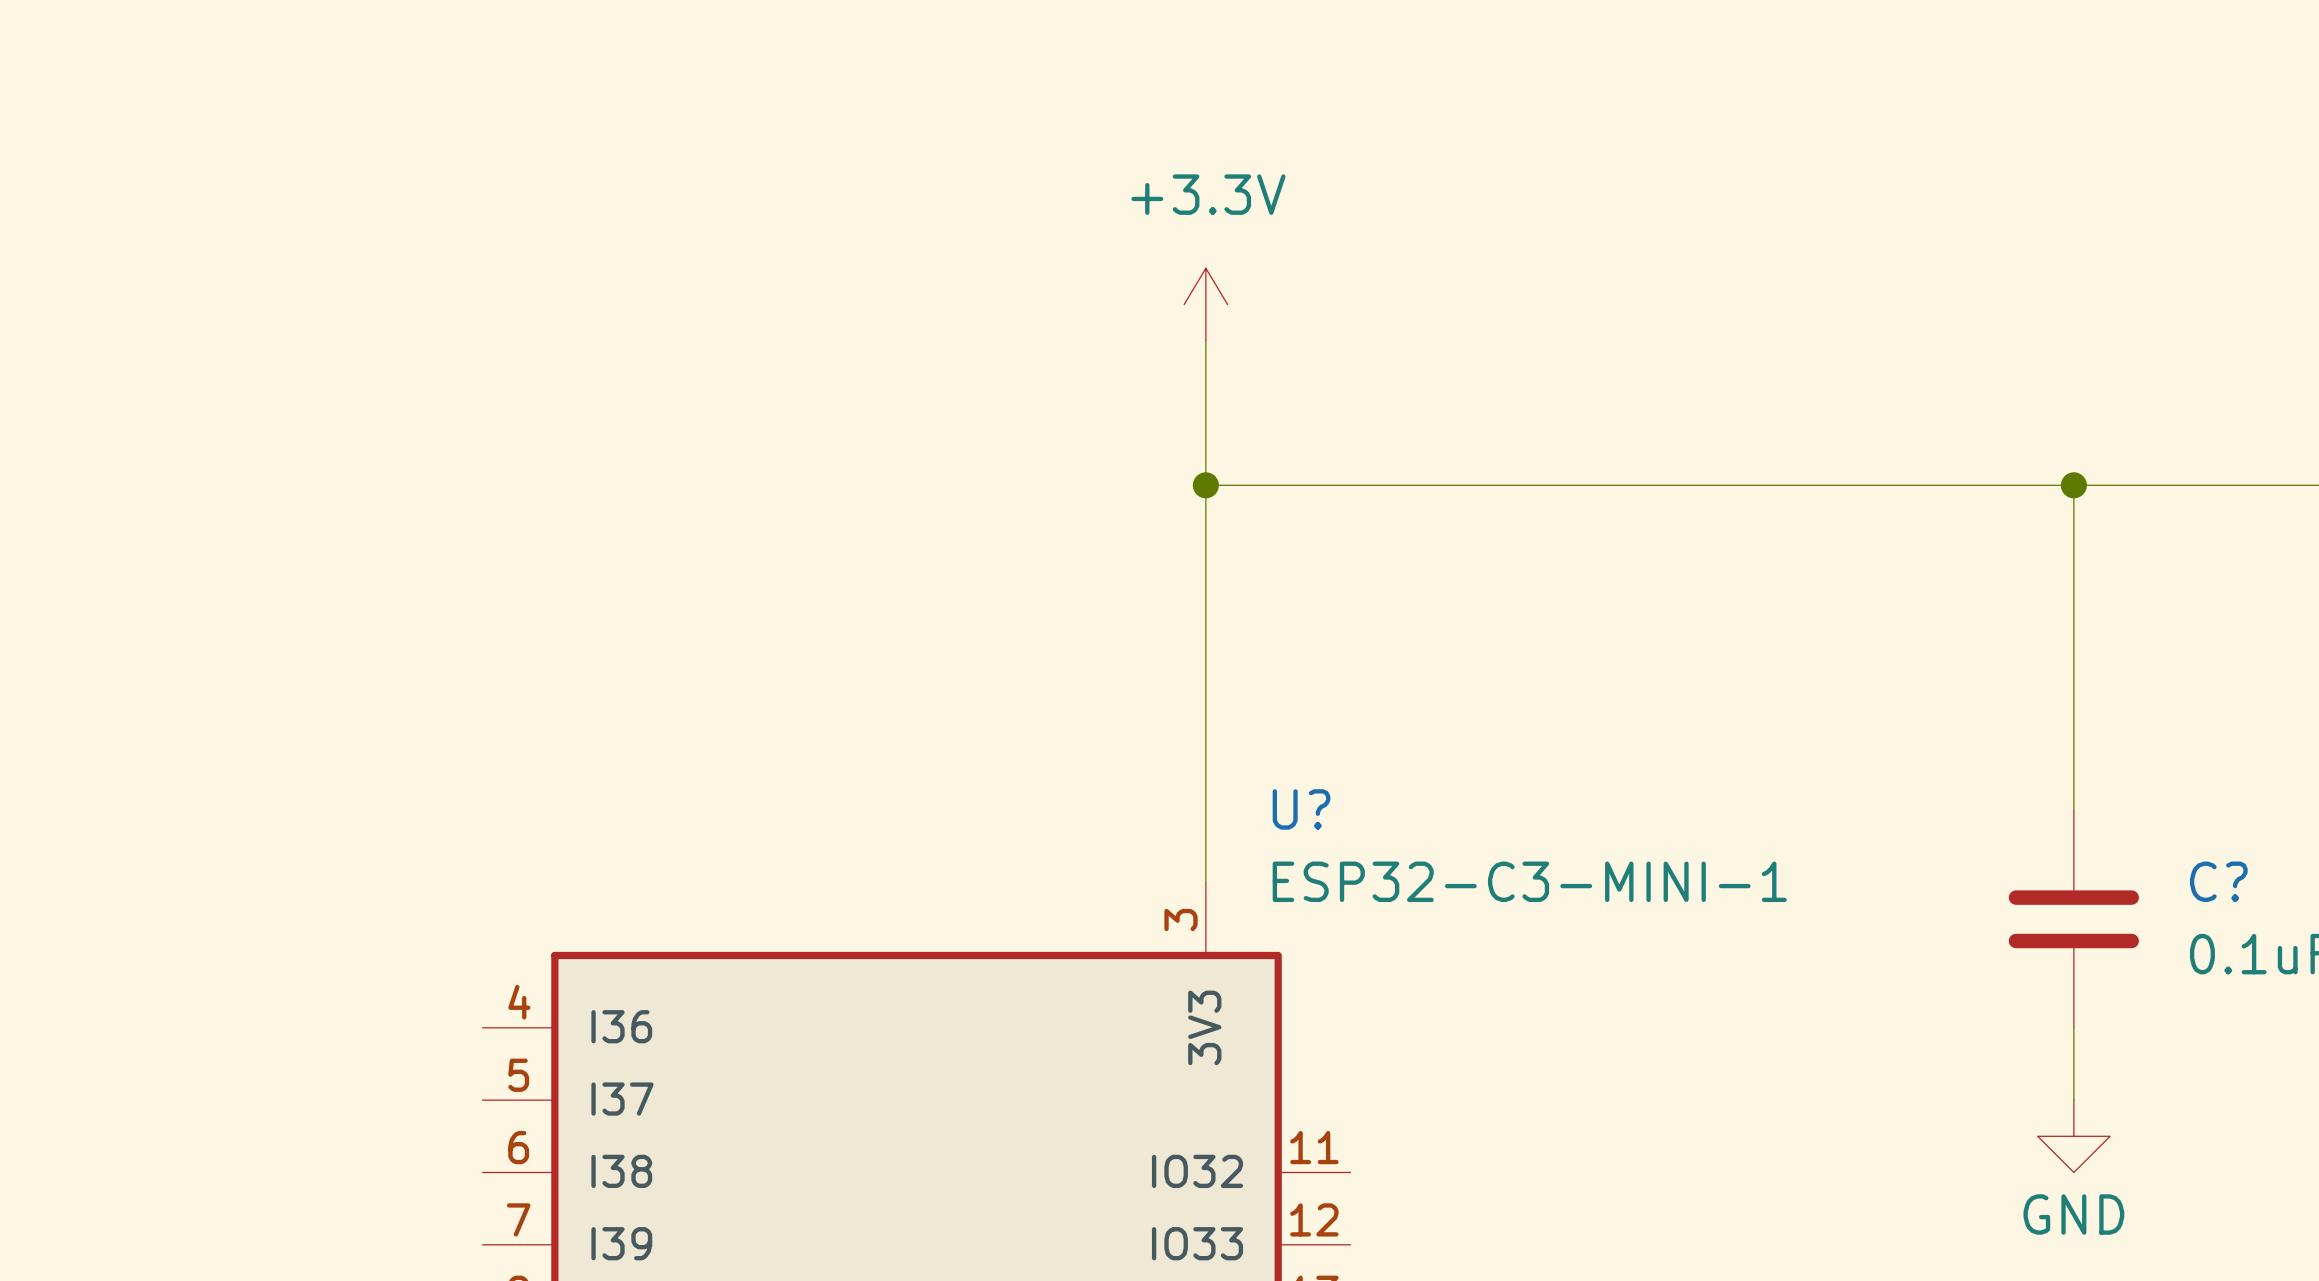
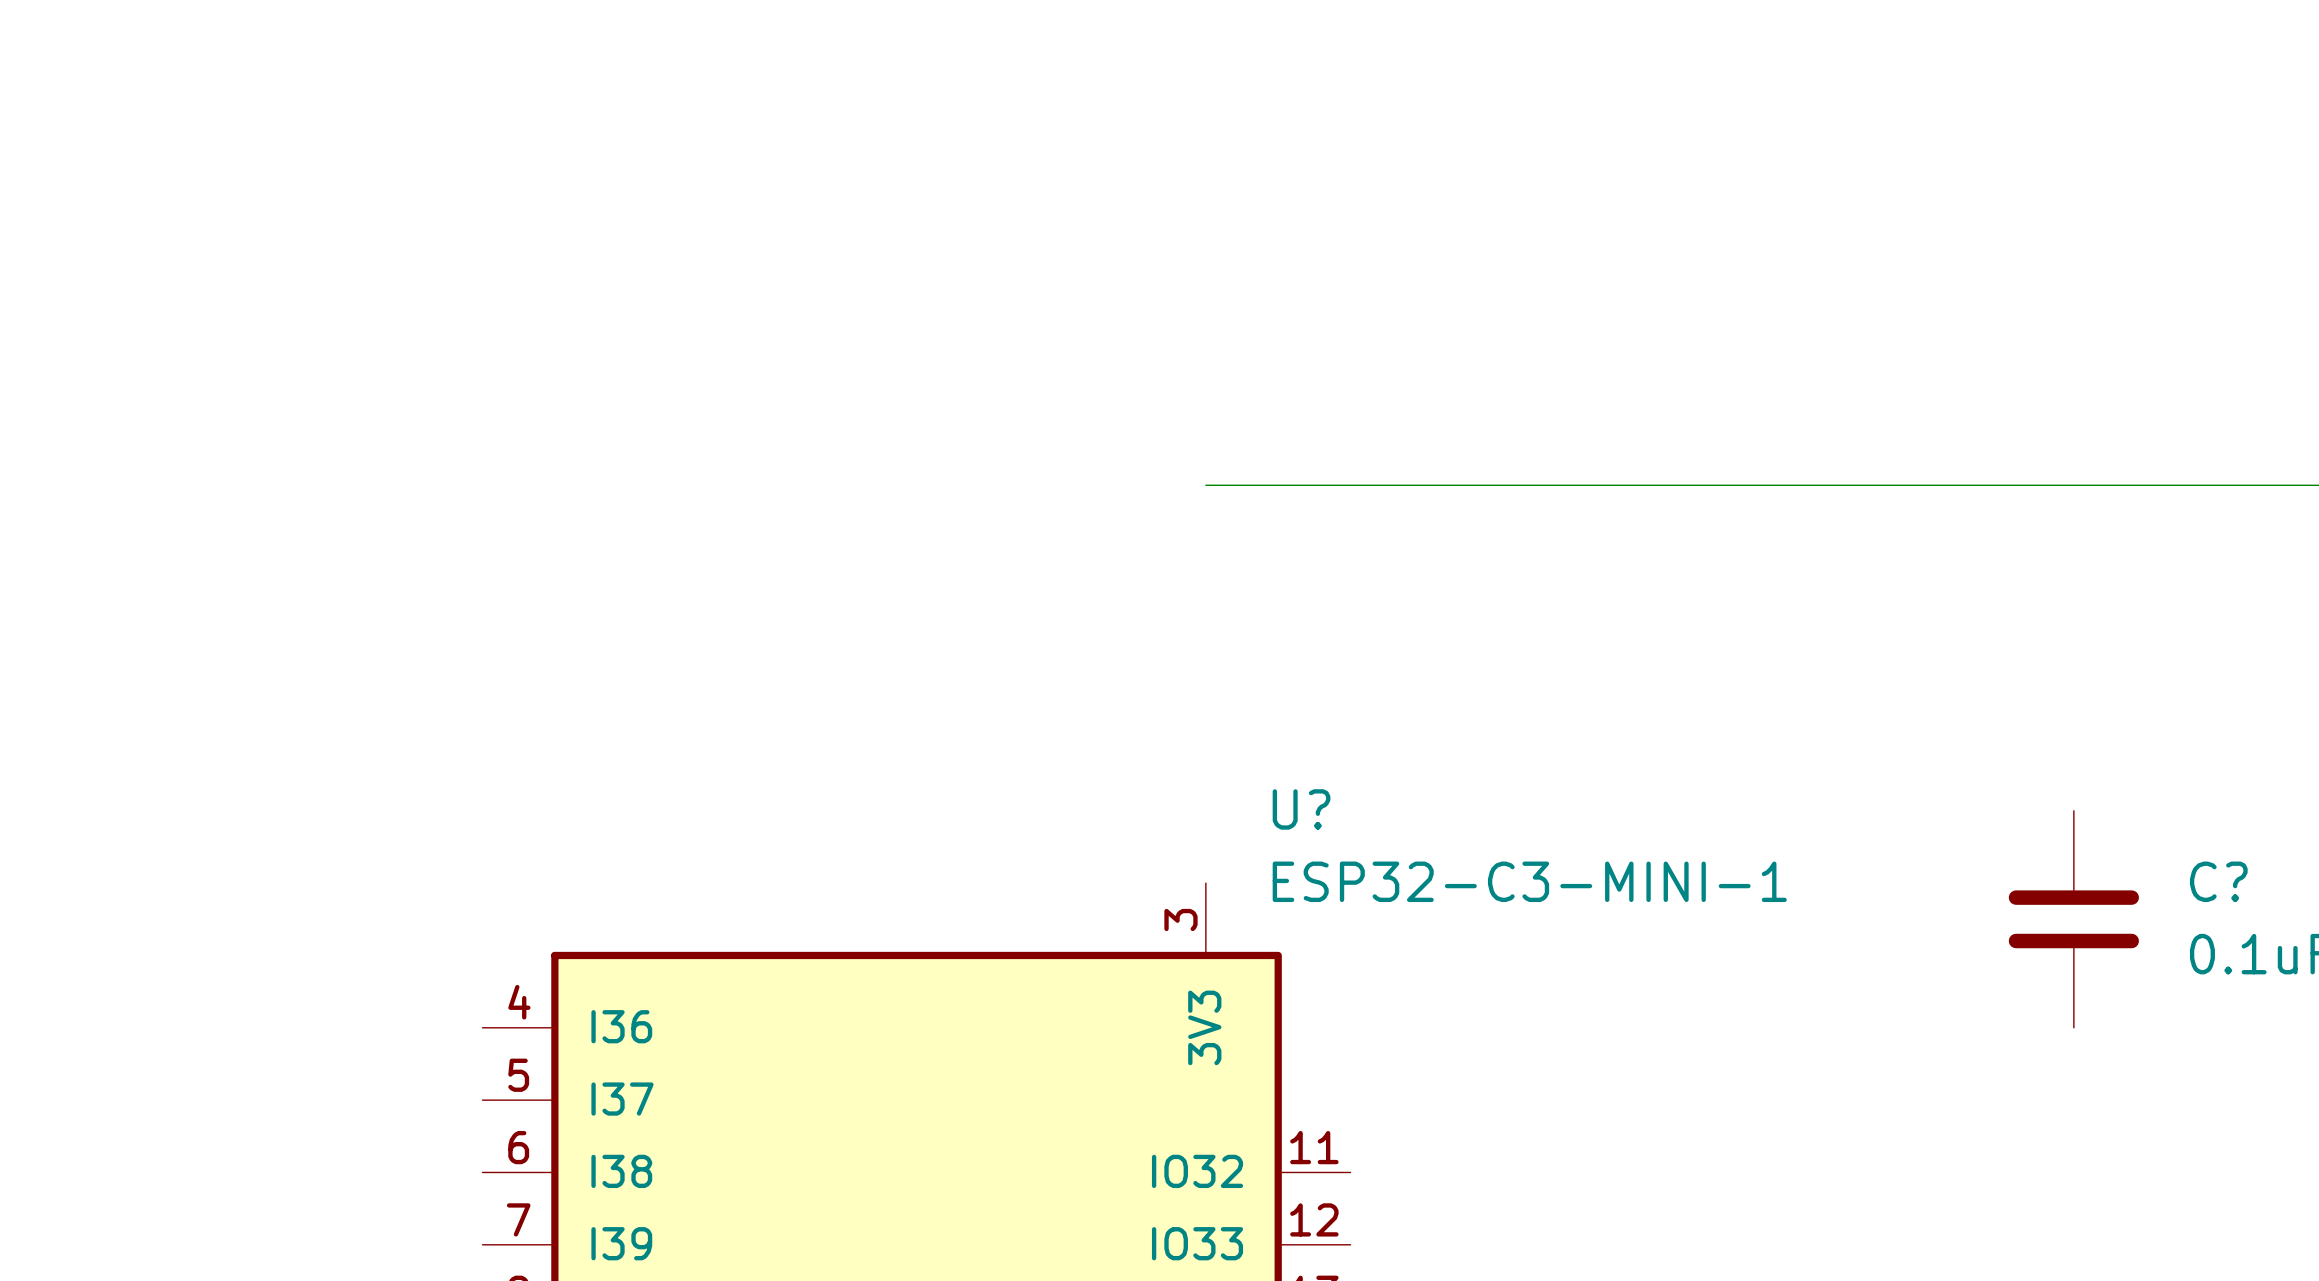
power symbol: +3.3V (1205, 304) -> none
wire: (1205, 340) (1205, 883) -> none
junction: (1205, 485) -> none
wire: (2073, 485) (2073, 810) -> none
junction: (2073, 485) -> none
wire: (2073, 1027) (2073, 1100) -> none
power symbol: GND (2073, 1136) -> none

